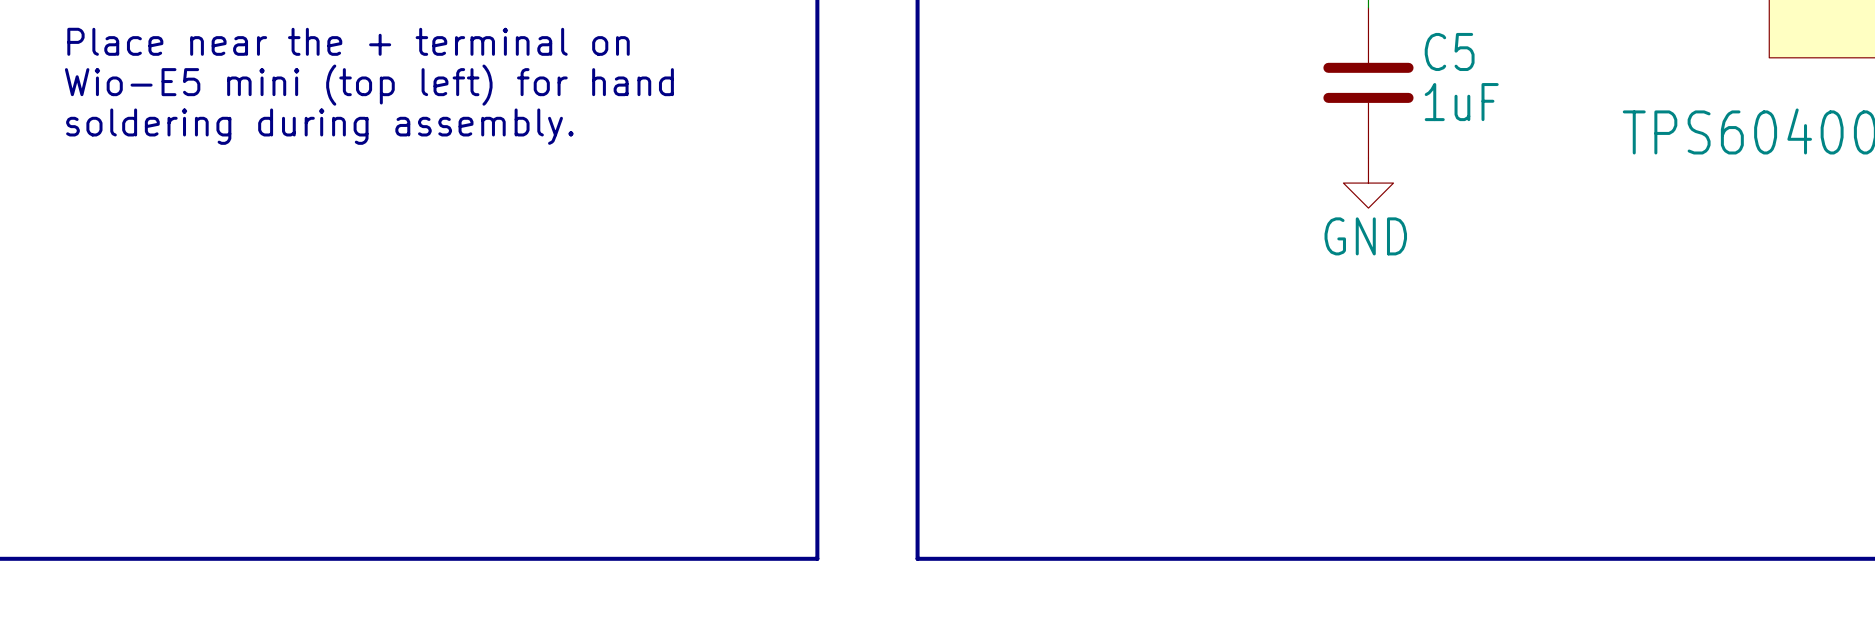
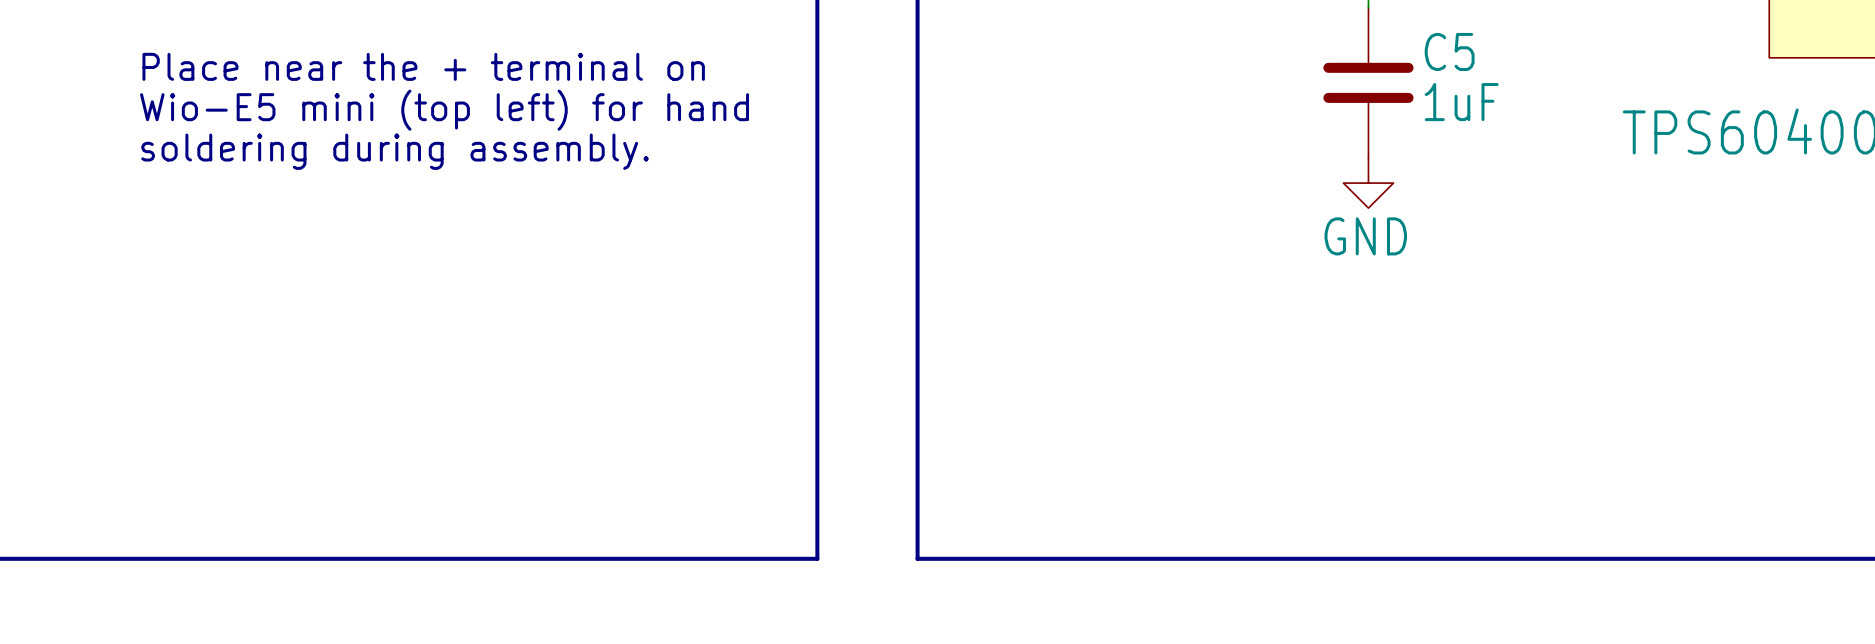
text position: Place near the + terminal on (348, 41) -> Place near the + terminal on (423, 66)
text position: Wio-E5 mini (top left) for hand (369, 85) -> Wio-E5 mini (top left) for hand (444, 110)
text position: soldering during assembly. (319, 126) -> soldering during assembly. (395, 151)

